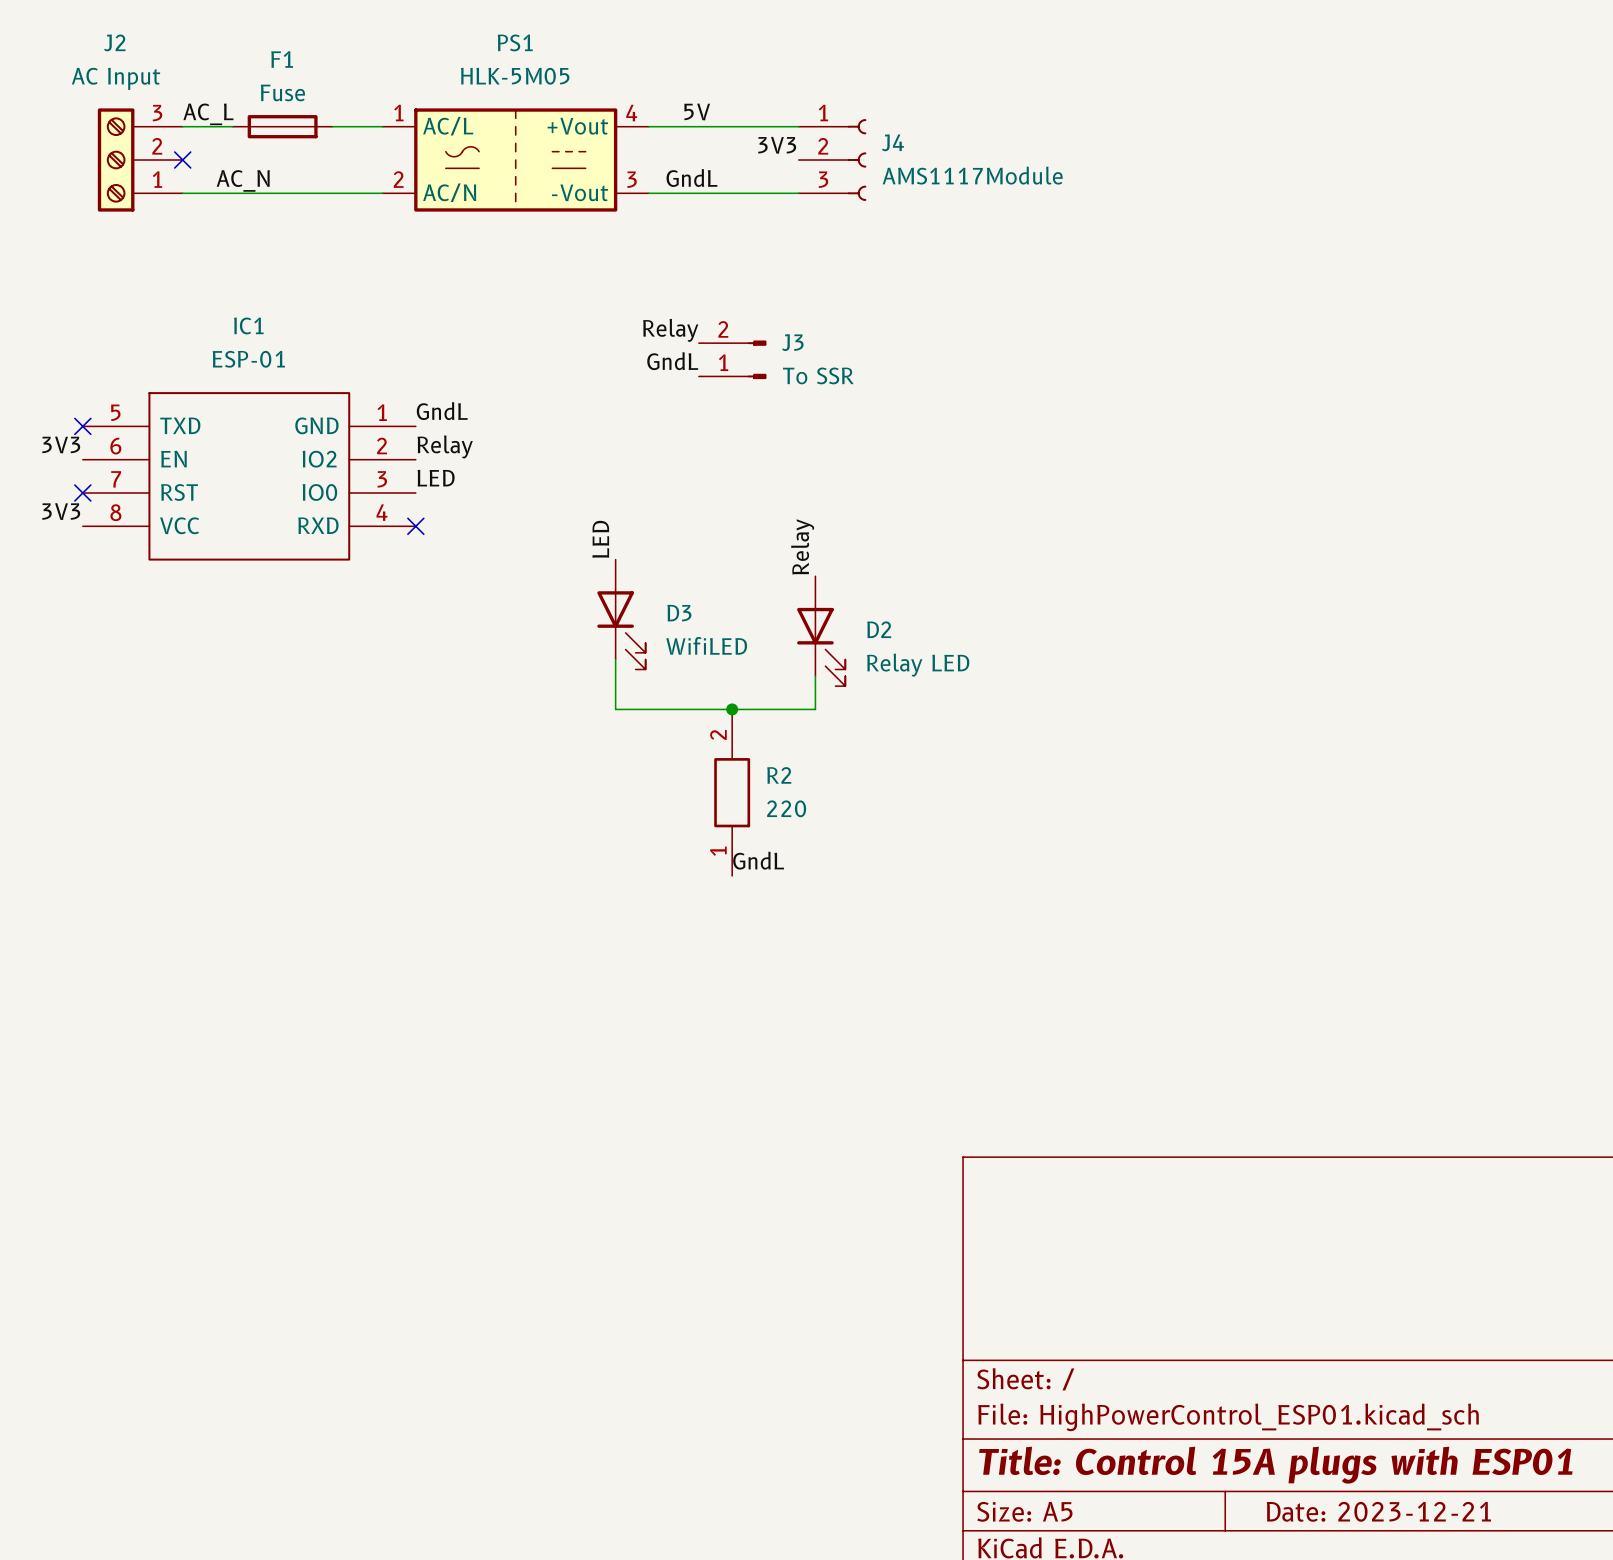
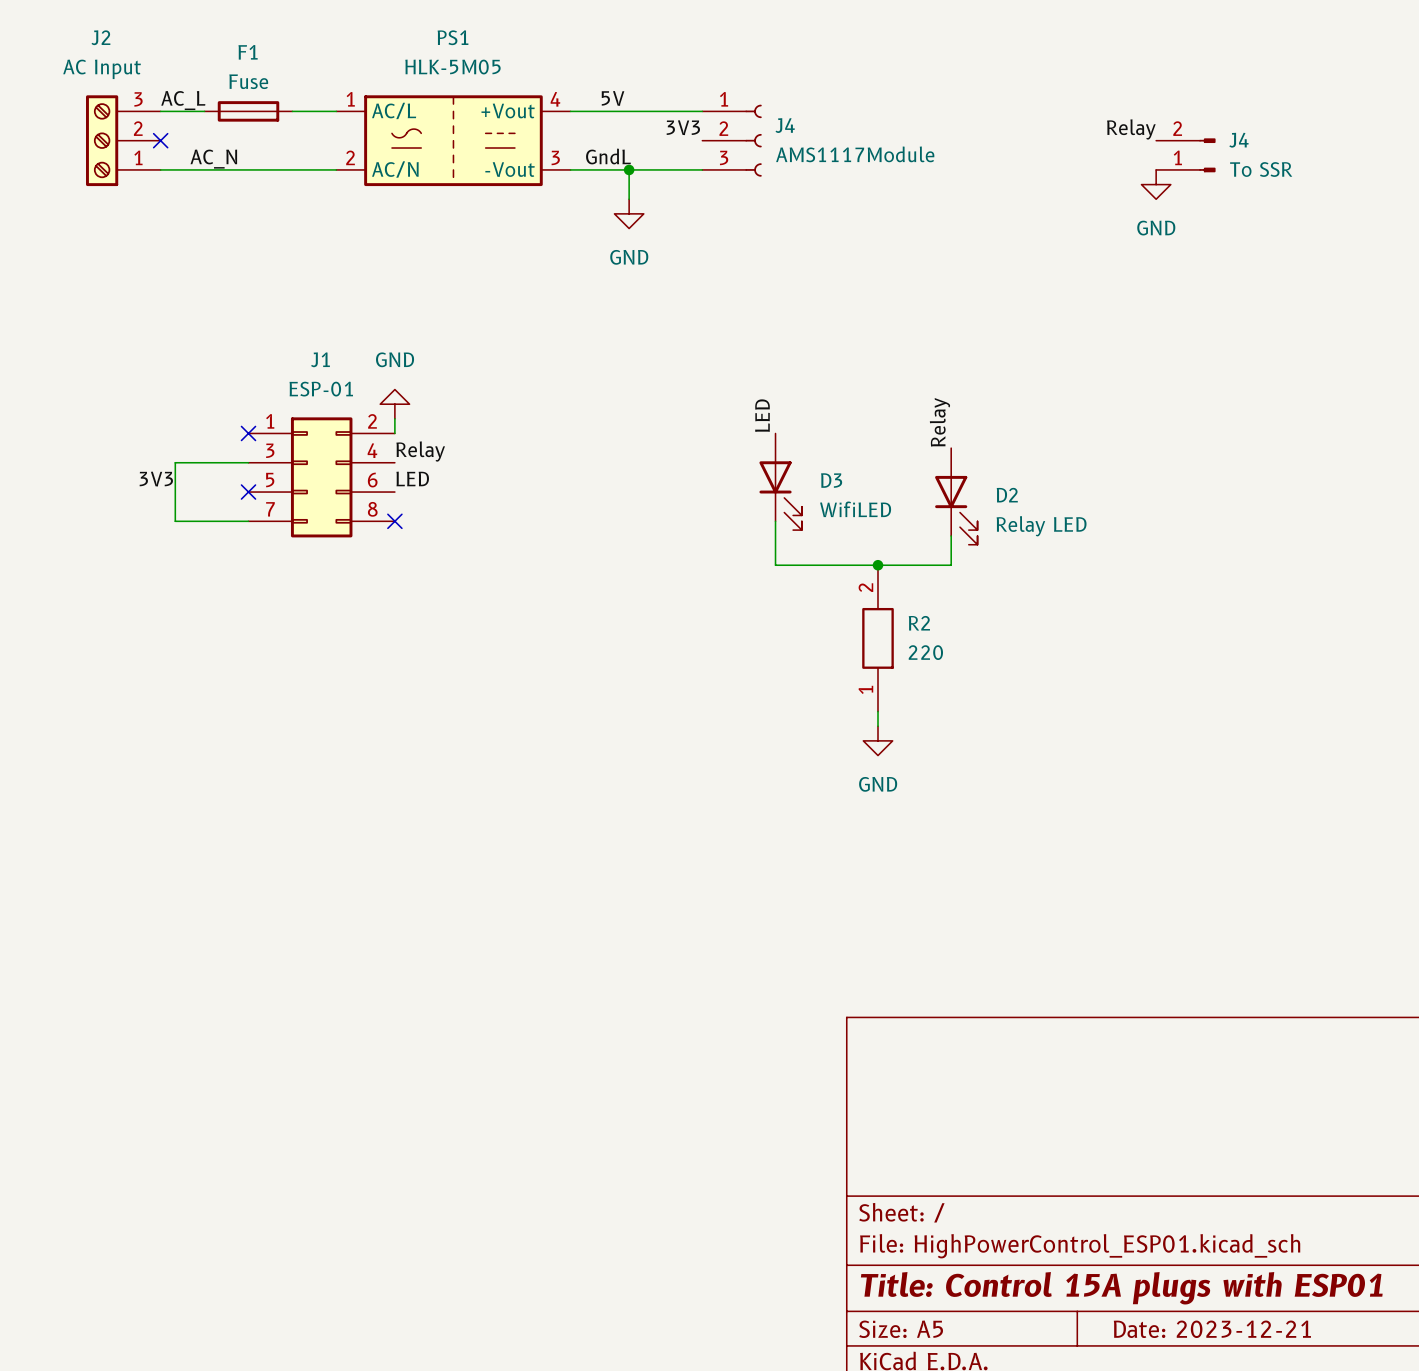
label: none -> Relay (1131, 129)
J4: none -> To SSR (1185, 155)
wire: none -> (629, 169) (629, 199)
junction: none -> (629, 169)
power symbol: none -> GND (1156, 184)
power symbol: none -> GND (629, 213)
label: Relay (670, 330) -> none
J3: To SSR (732, 359) -> none
label: GndL (672, 361) -> none
label: GndL (442, 411) -> none
no-connect mark: (82, 426) -> none
label: 3V3 (61, 444) -> none
label position: Relay (445, 446) -> Relay (420, 451)
power symbol: none -> GND (394, 404)
label: none -> LED (762, 415)
IC1: ESP-01 (249, 476) -> none
wire: none -> (394, 418) (394, 433)
label position: LED (436, 478) -> LED (412, 478)
label: none -> Relay (939, 422)
no-connect mark: (82, 492) -> none
no-connect mark: none -> (248, 433)
label: 3V3 (61, 511) -> none
wire: none -> (248, 462) (175, 462) (175, 521) (248, 521)
no-connect mark: (415, 526) -> none
label: LED (600, 539) -> none
J1: none -> ESP-01 (321, 477)
label: none -> 3V3 (156, 479)
label: Relay (802, 546) -> none
no-connect mark: none -> (248, 492)
no-connect mark: none -> (394, 521)
D3 position: (621, 614) -> (780, 481)
D2 position: (821, 631) -> (956, 496)
junction: none -> (877, 565)
wire: (615, 659) (615, 709) (815, 709) (815, 676) -> (775, 521) (775, 565) (951, 565) (951, 535)
junction: (732, 709) -> none
R2 position: (732, 792) -> (877, 638)
wire: none -> (877, 711) (877, 726)
power symbol: none -> GND (877, 740)
label: GndL (758, 860) -> none

